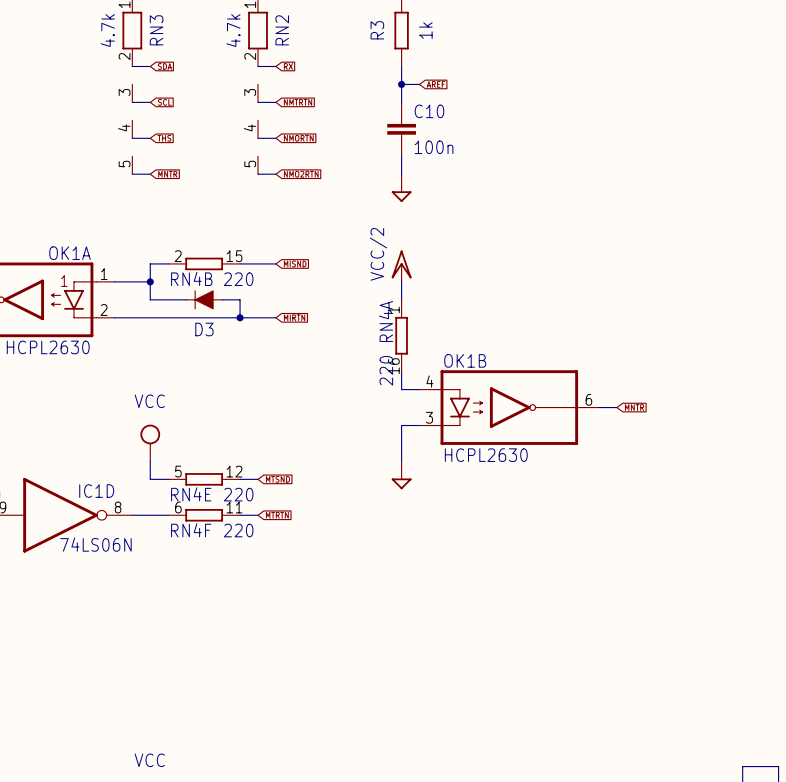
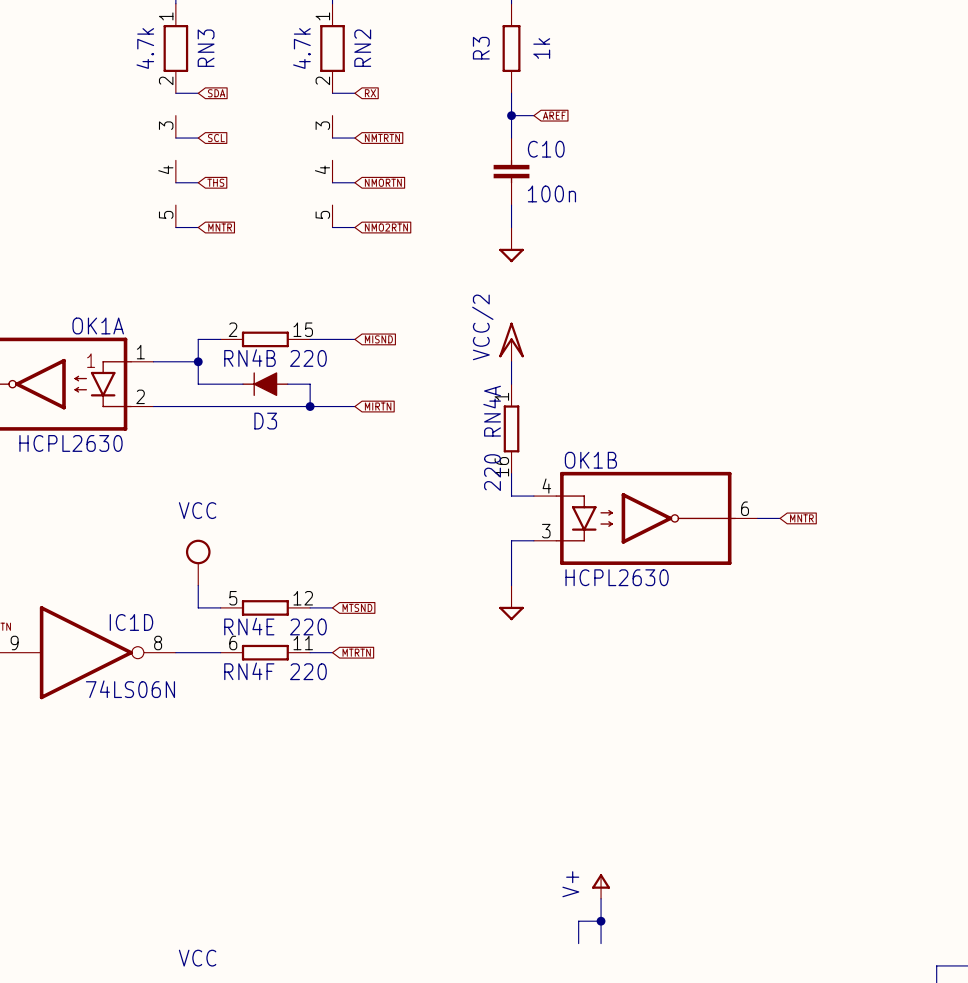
power symbol: none -> V+ (601, 886)
wire: none -> (601, 898) (601, 943)
wire: none -> (601, 921) (578, 921) (578, 943)
junction: none -> (601, 921)

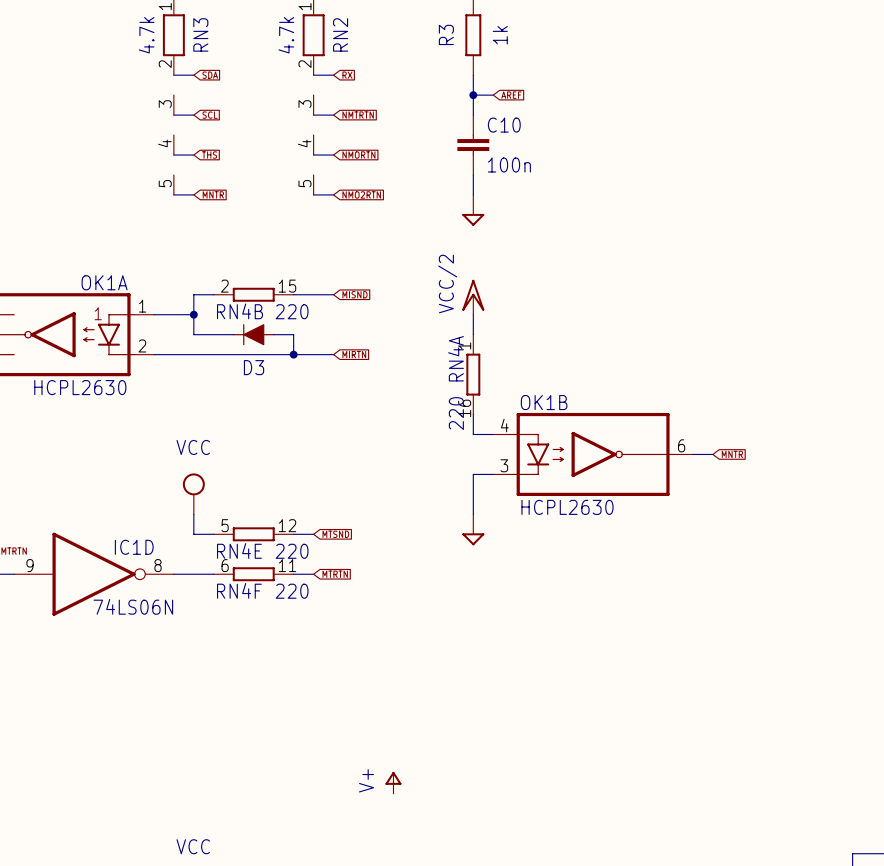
power symbol position: V+ (601, 886) -> V+ (393, 782)
wire: (601, 898) (601, 943) -> none
wire: (601, 921) (578, 921) (578, 943) -> none
junction: (601, 921) -> none

